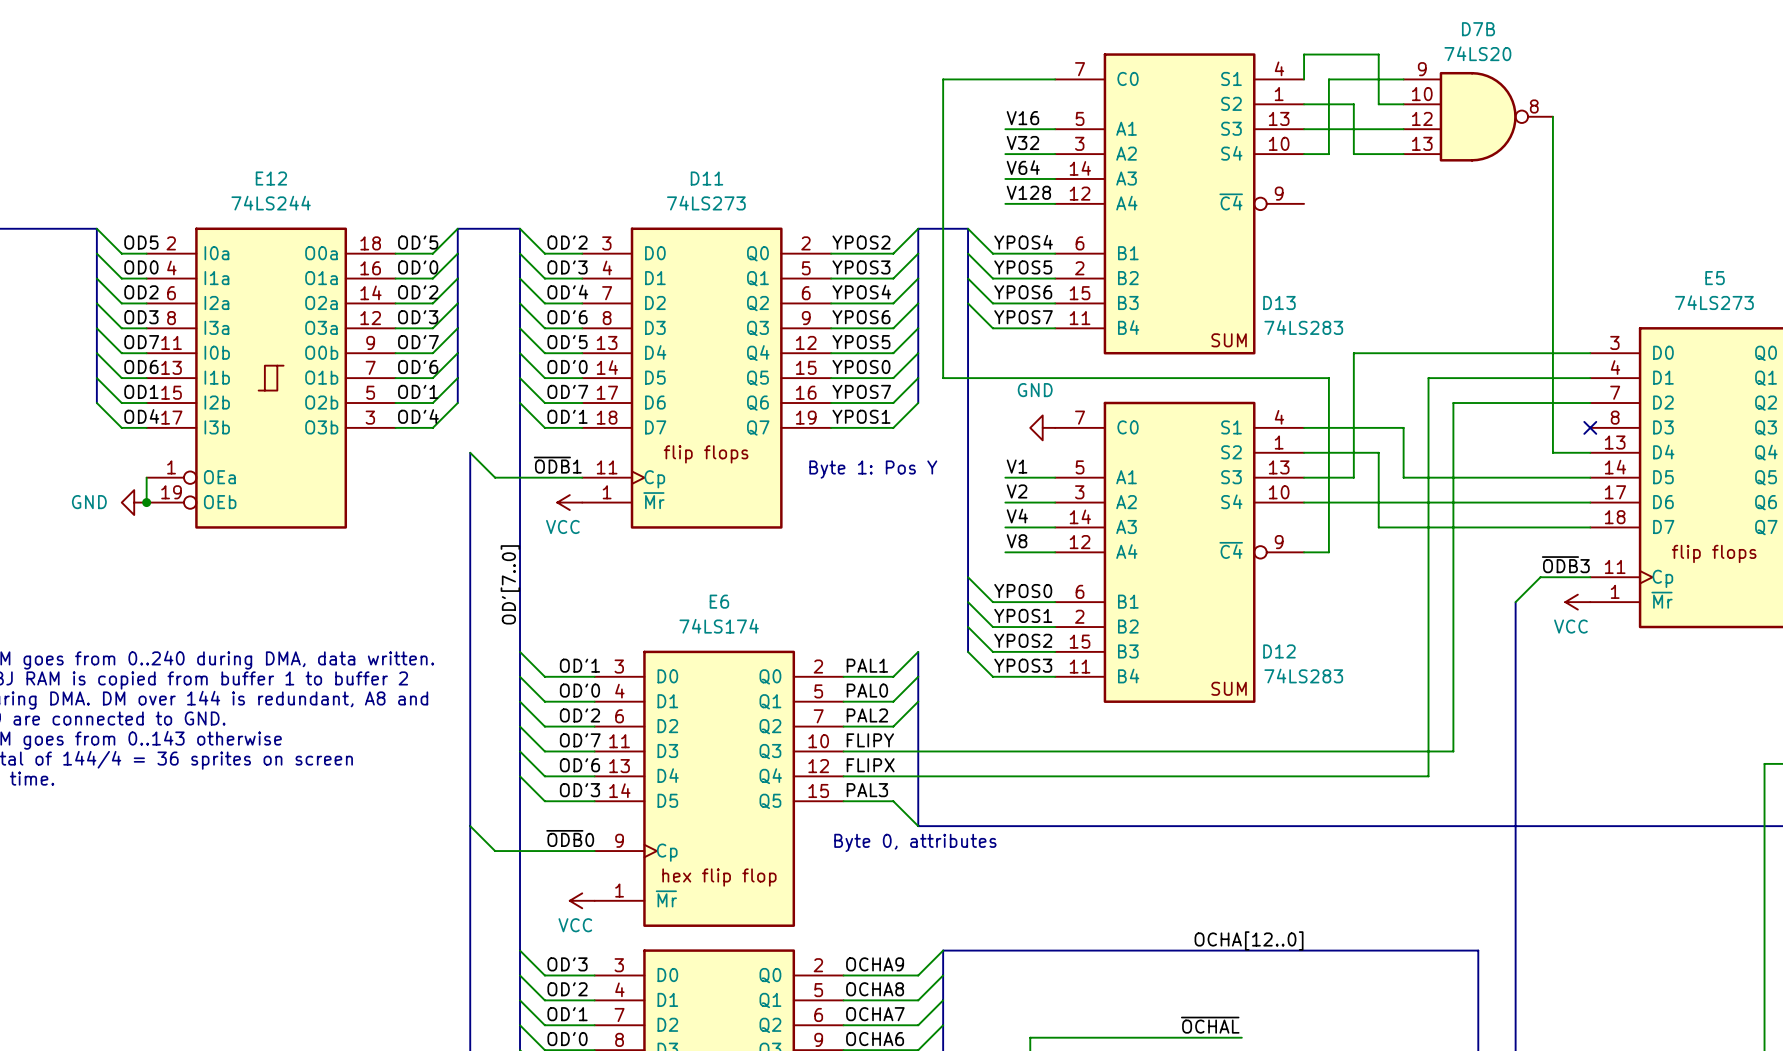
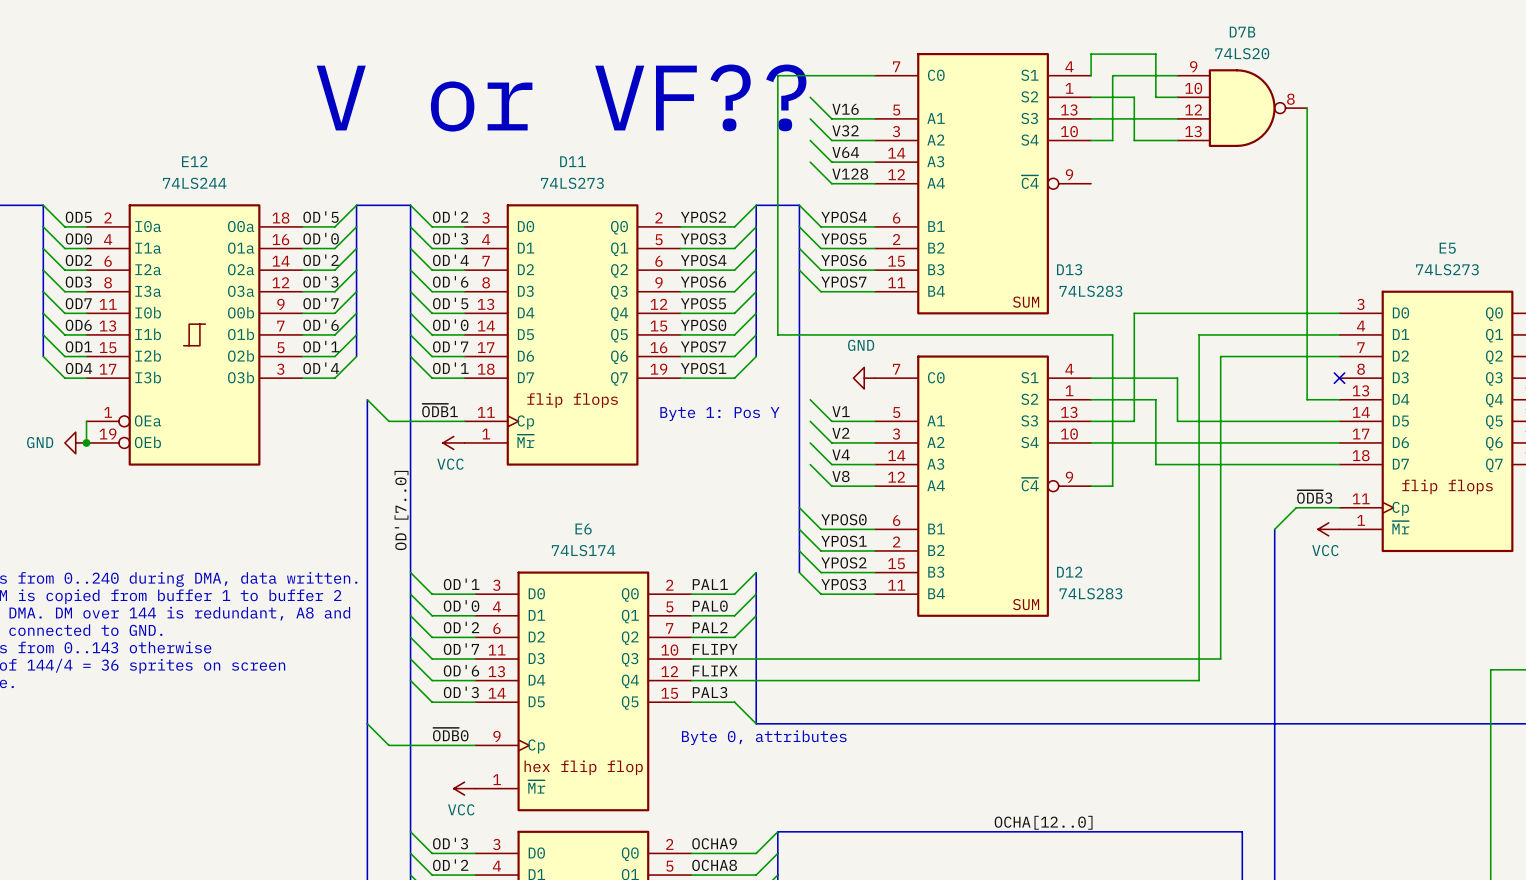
wire: none -> (810, 97) (831, 118)
text: none -> V or VF?? (561, 98)
wire: none -> (810, 118) (831, 140)
wire: none -> (810, 140) (831, 162)
wire: none -> (810, 162) (831, 183)
wire: none -> (810, 399) (831, 421)
wire: none -> (810, 421) (831, 442)
wire: none -> (810, 442) (831, 464)
wire: none -> (810, 464) (831, 486)

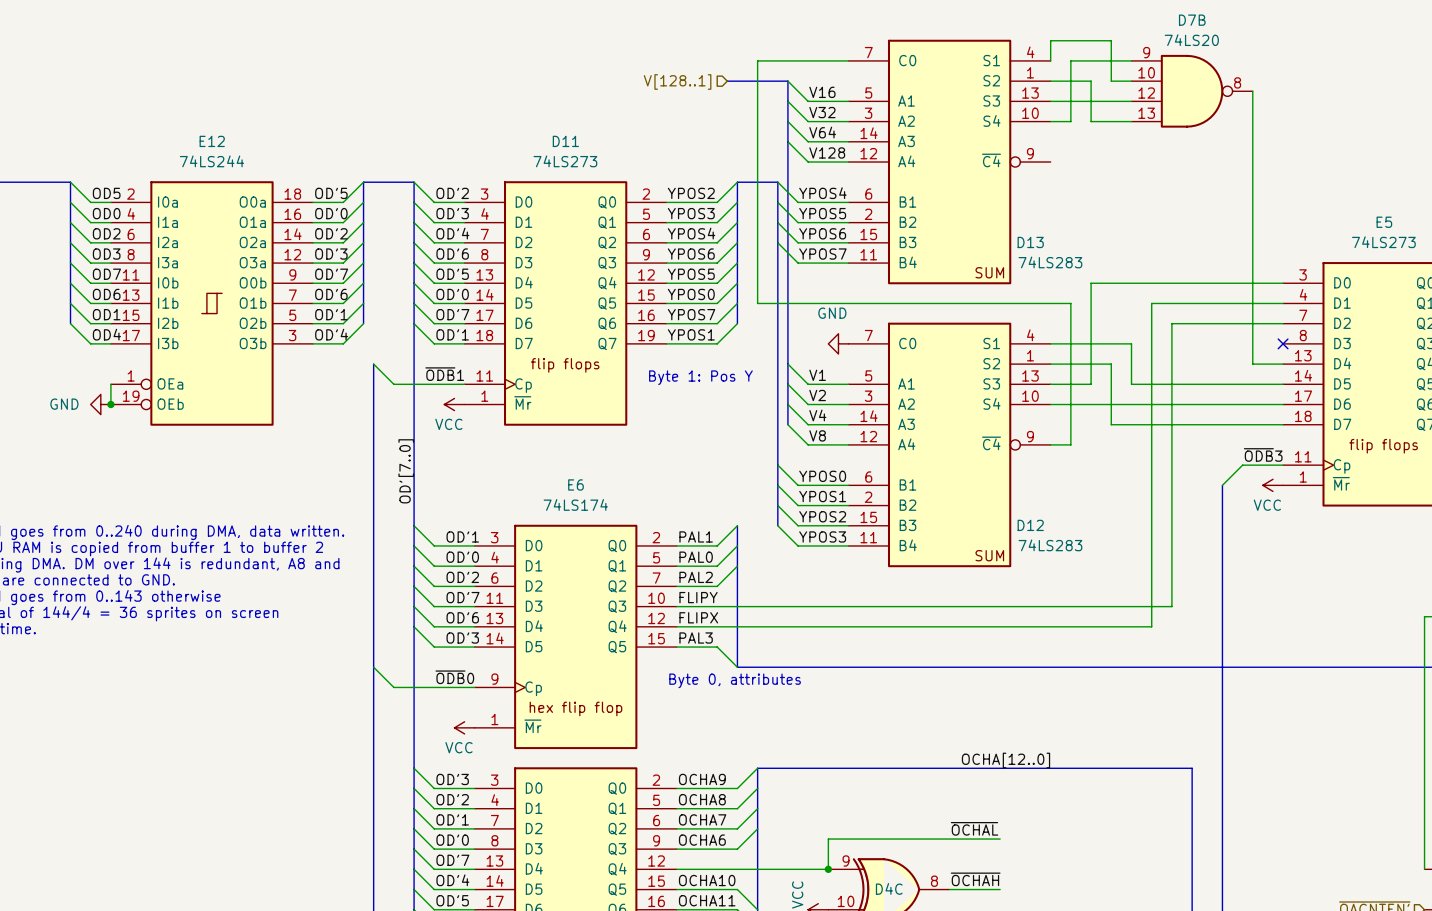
hierarchical label: none -> V[128..1] (677, 81)
bus: none -> (727, 81) (787, 81) (787, 424)
text: V or VF?? (561, 98) -> none

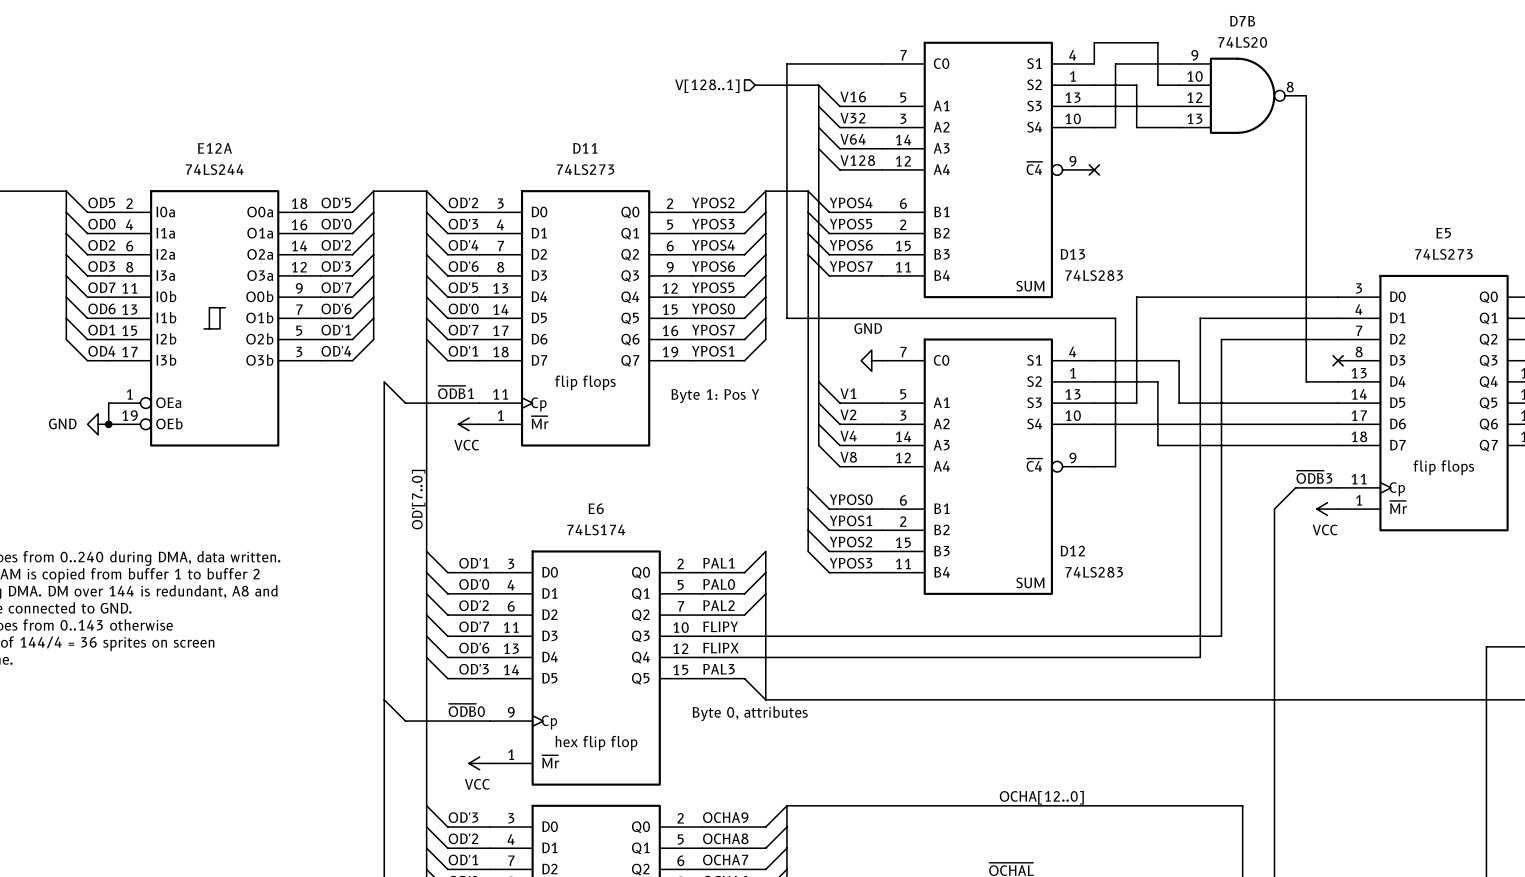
E12 name: E12 (212, 141) -> E12A (215, 148)
no-connect mark: none -> (1094, 169)

